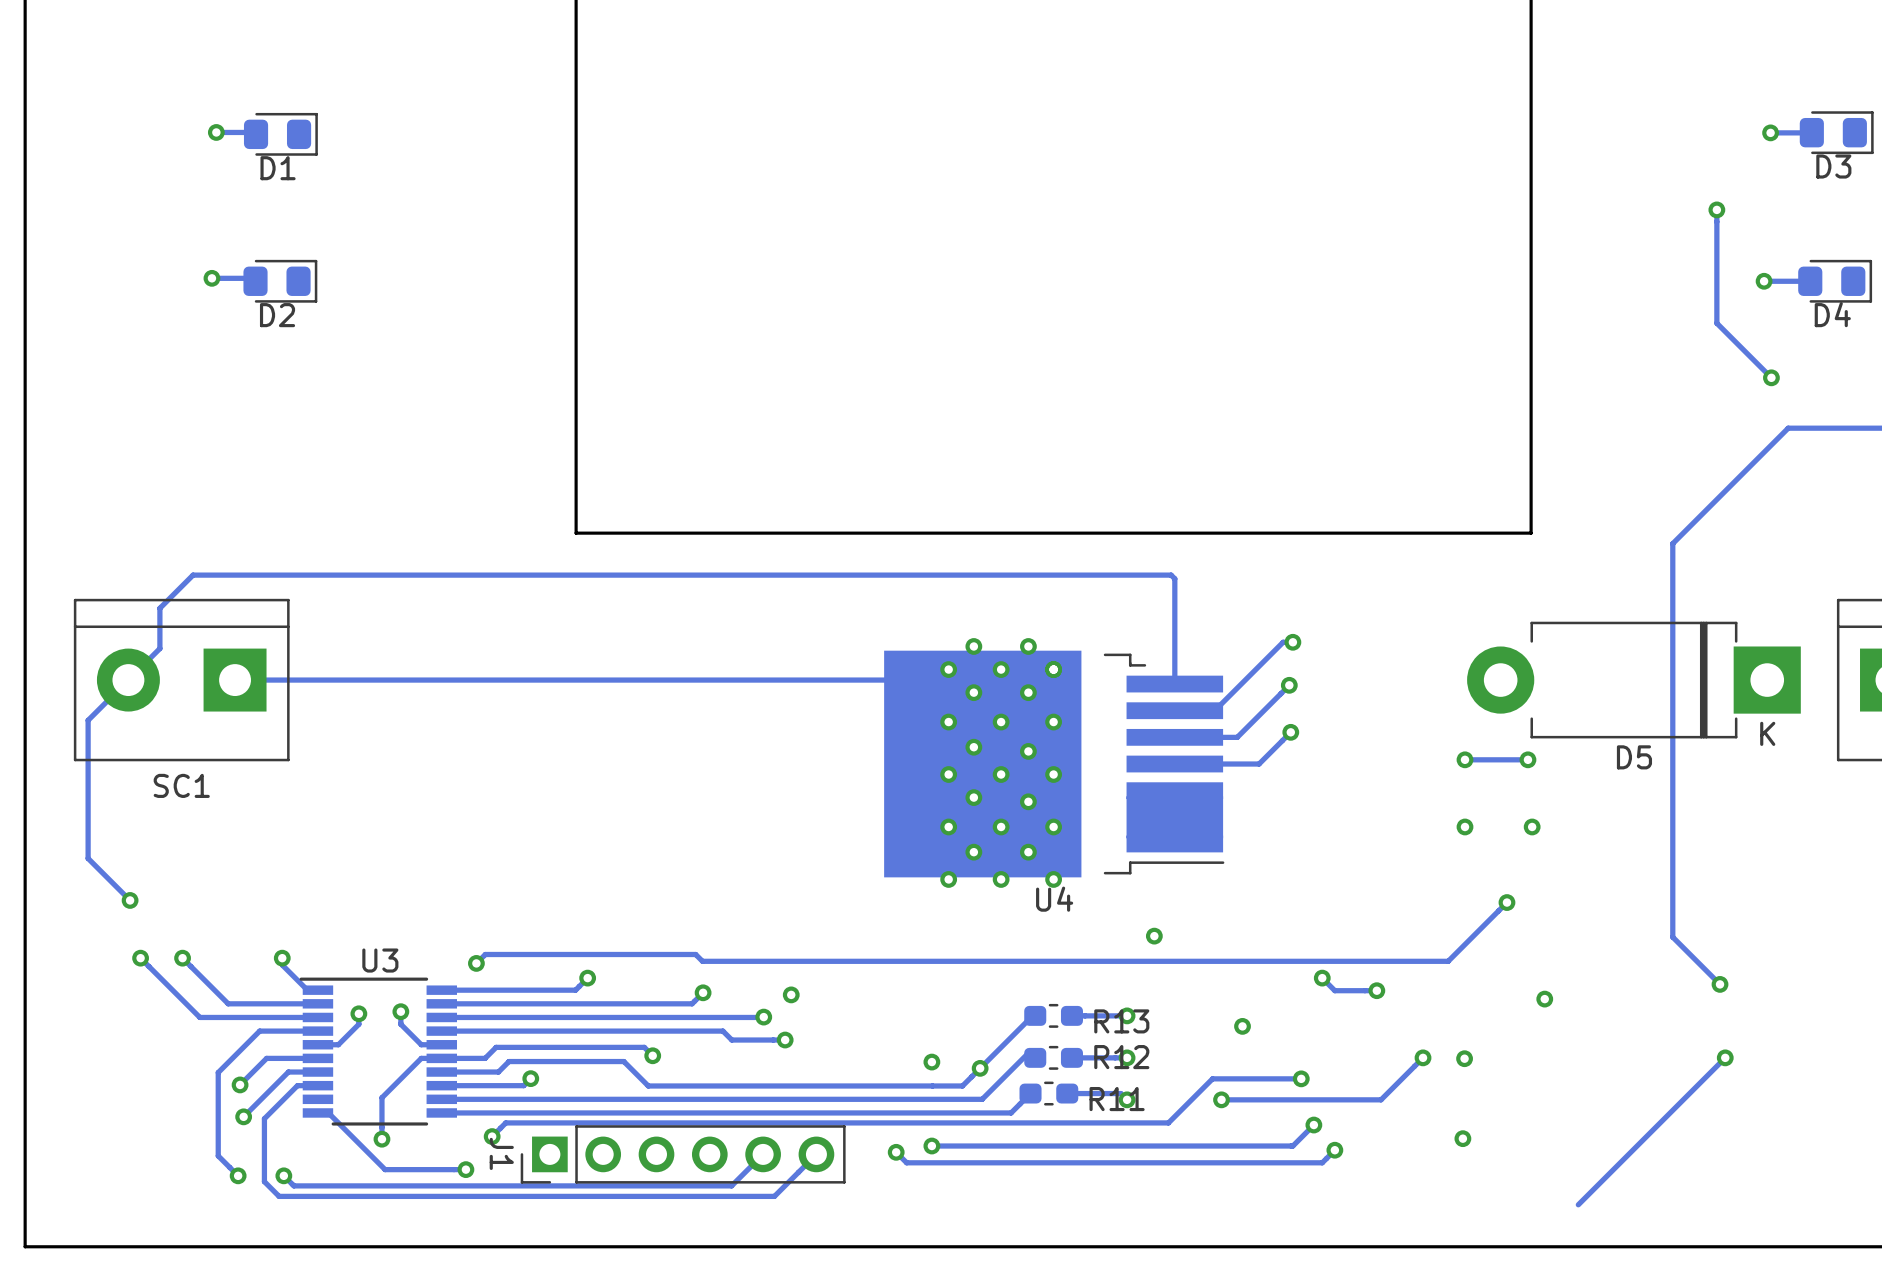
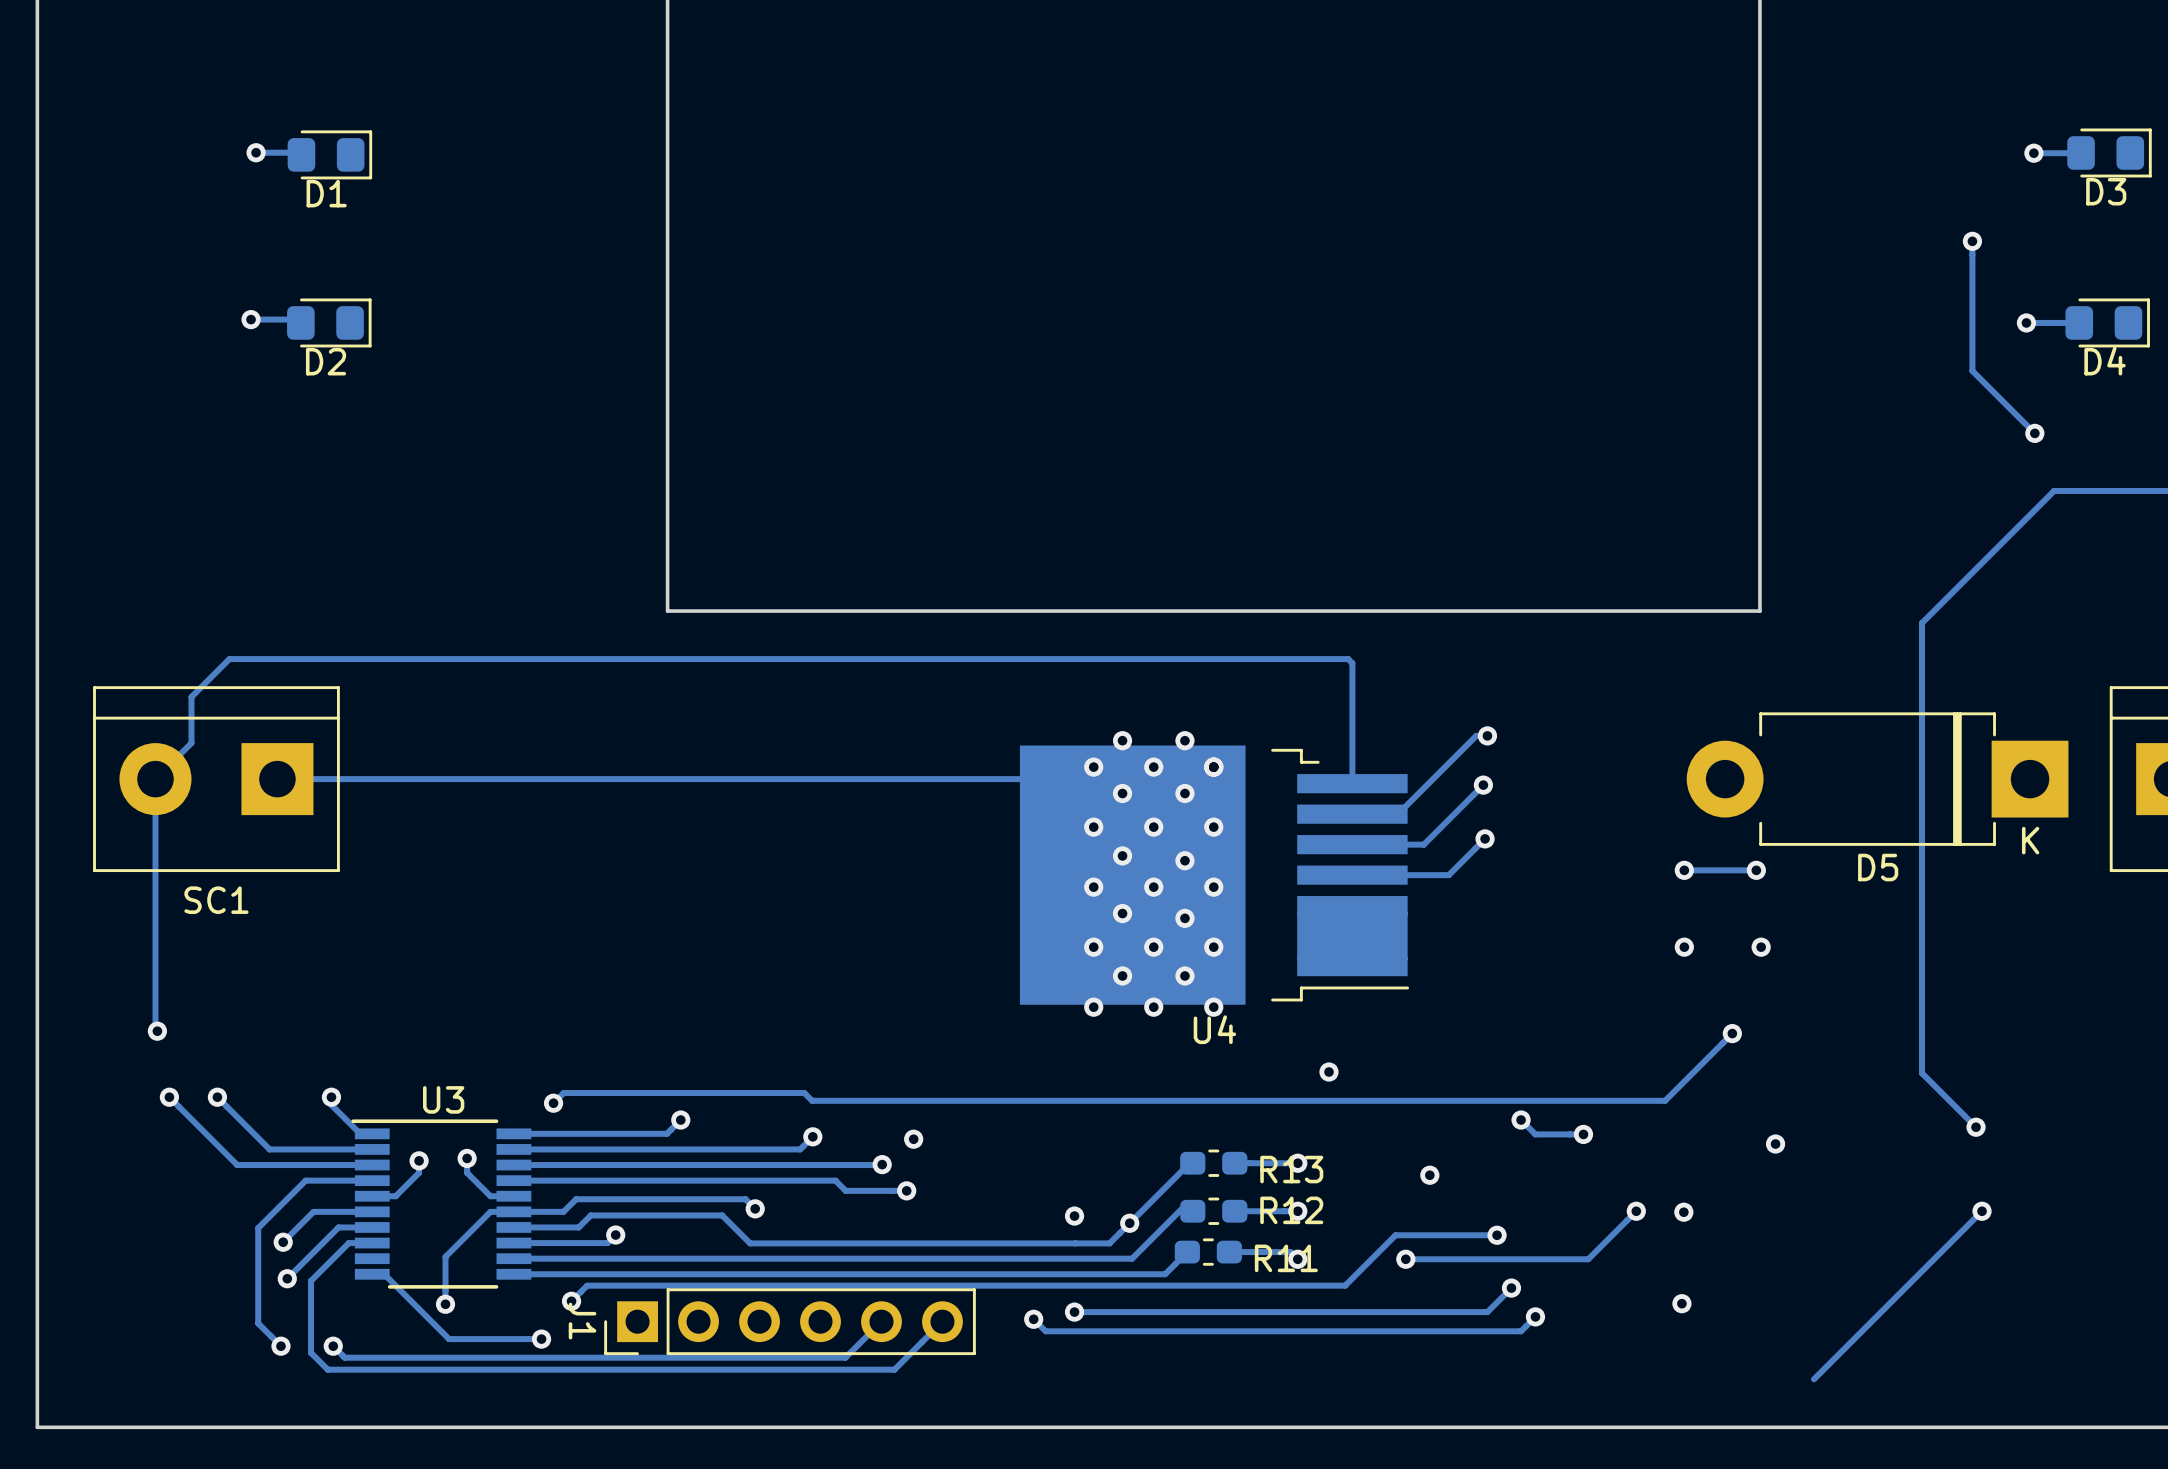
track: (128, 680) (88, 720) (88, 858) (128, 898) -> (155, 779) (155, 1029)

